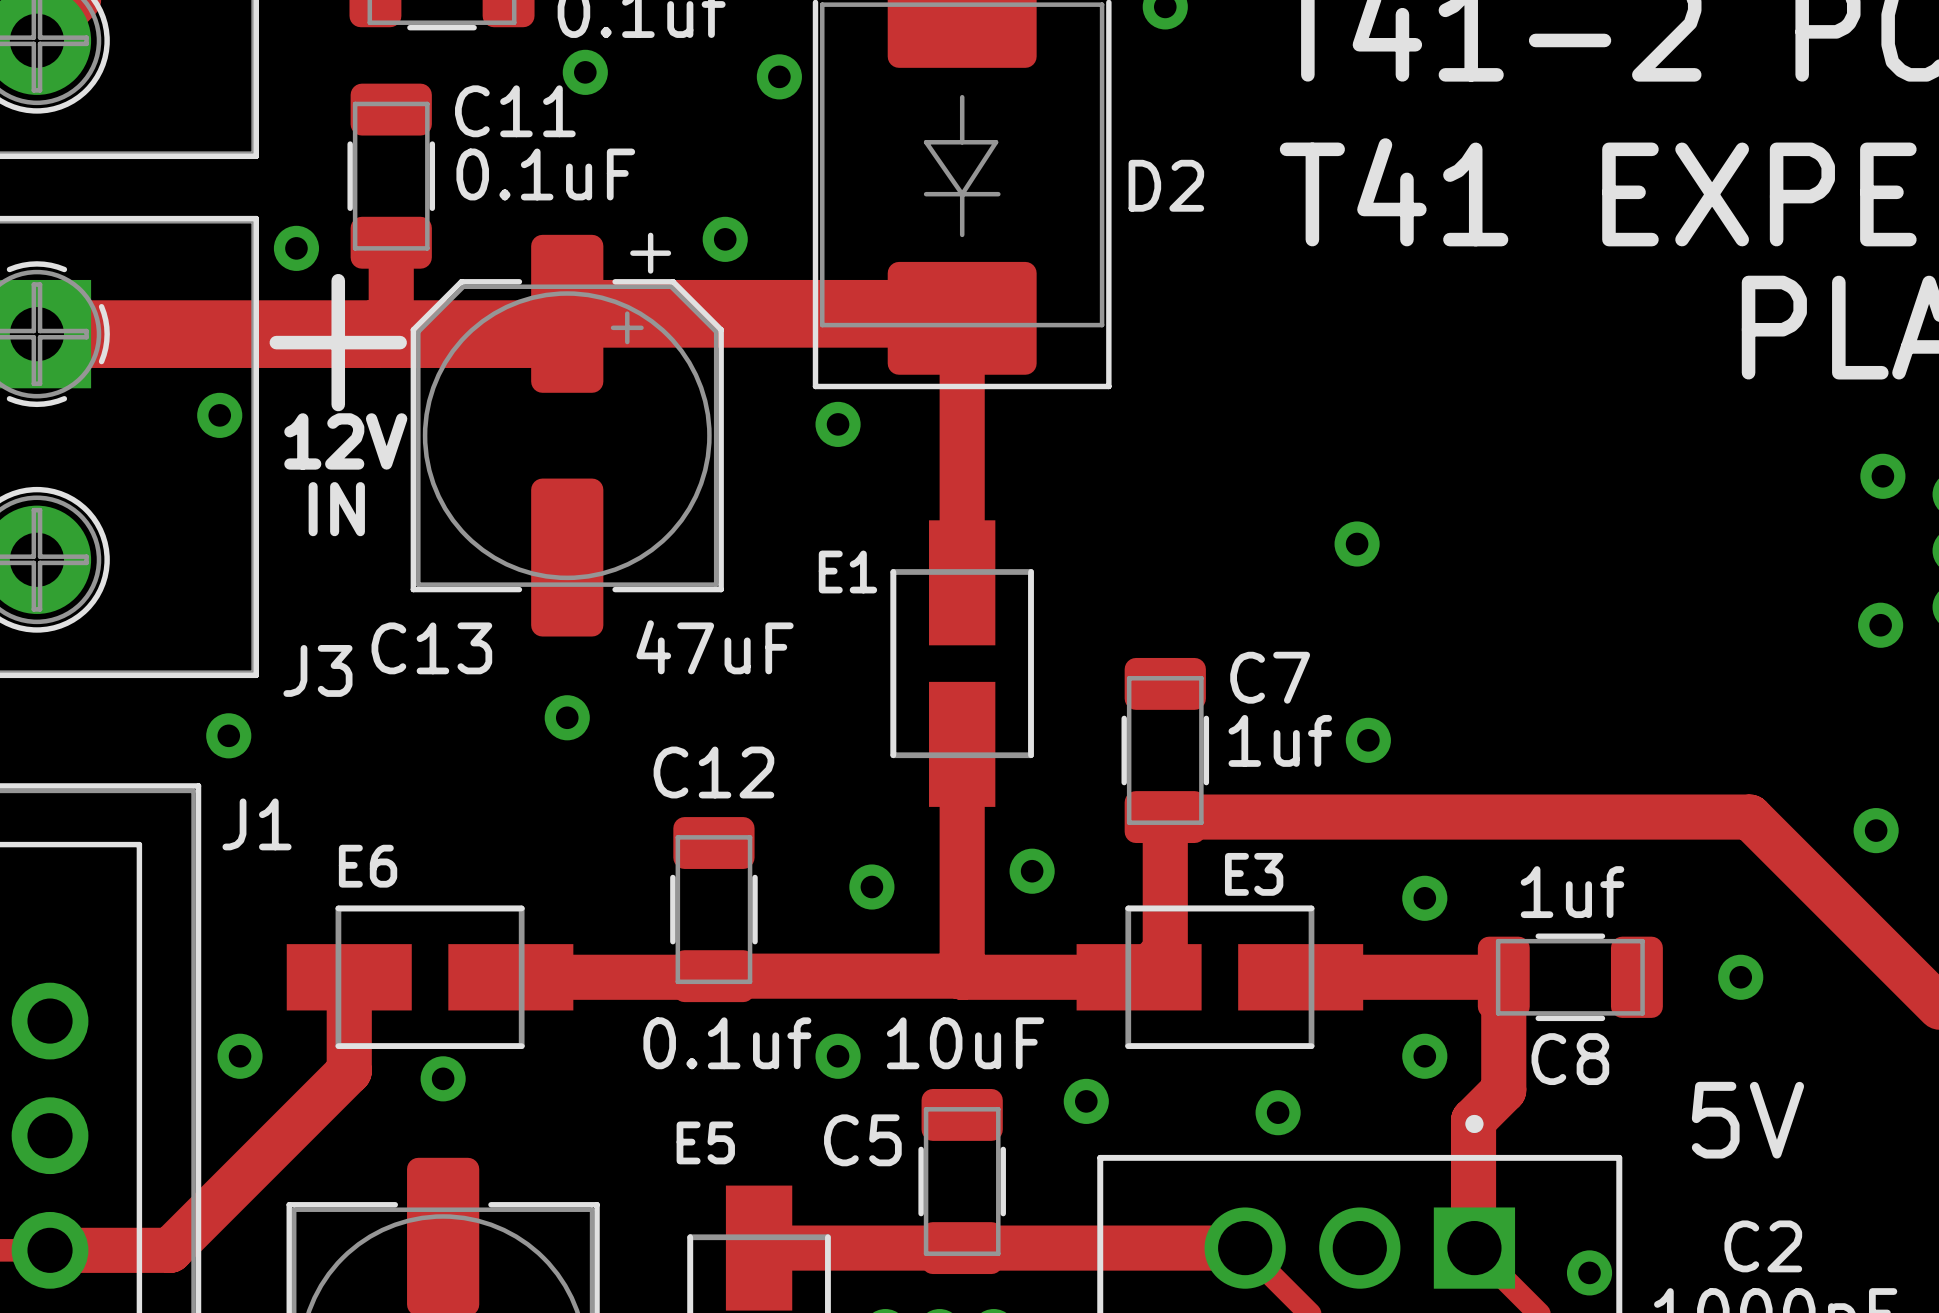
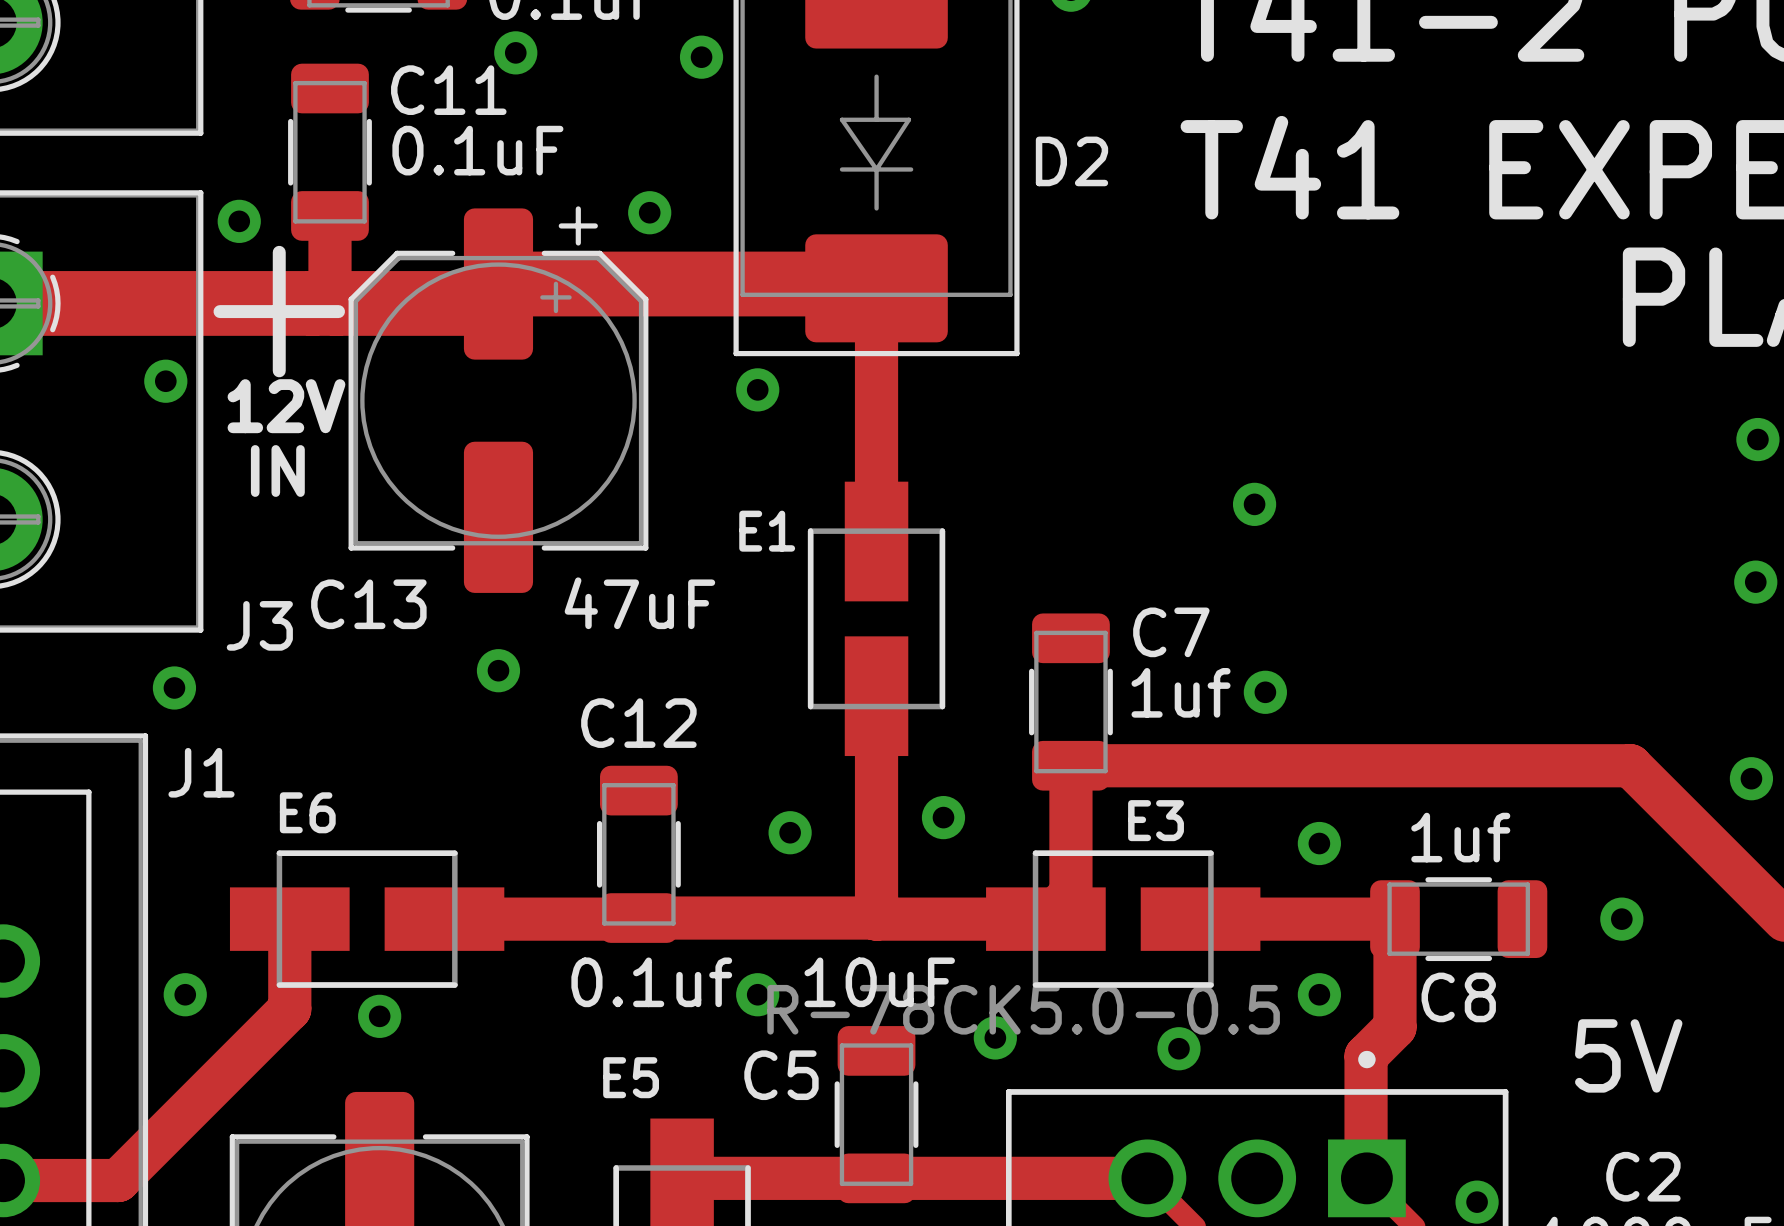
part value: none -> R-78CK5.0-0.5 (1023, 1009)

